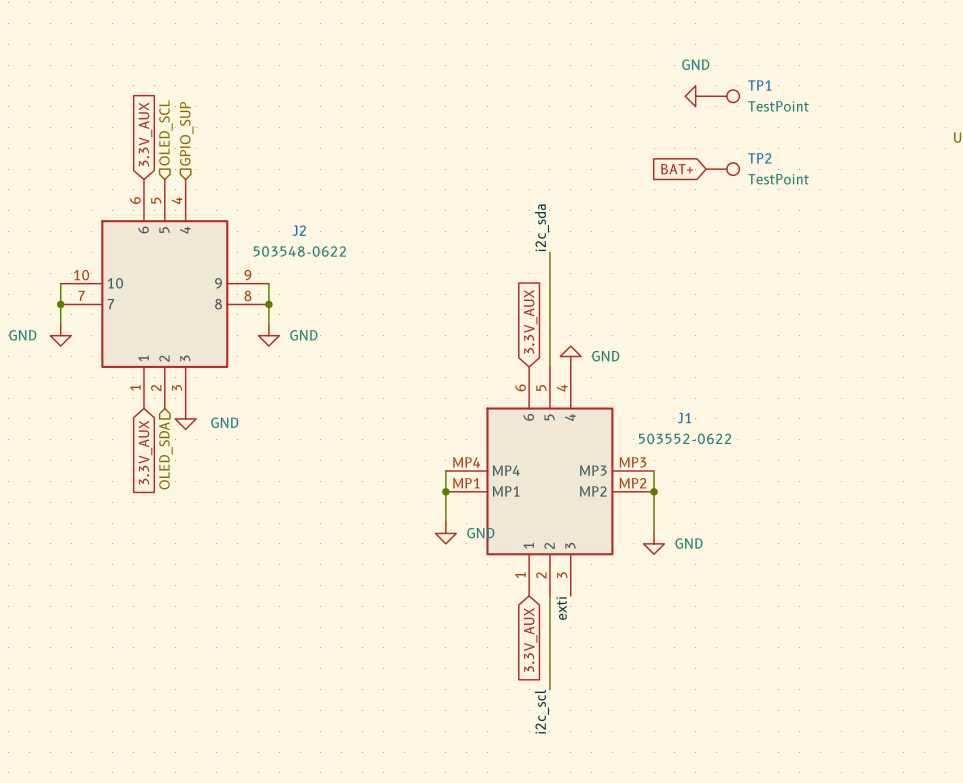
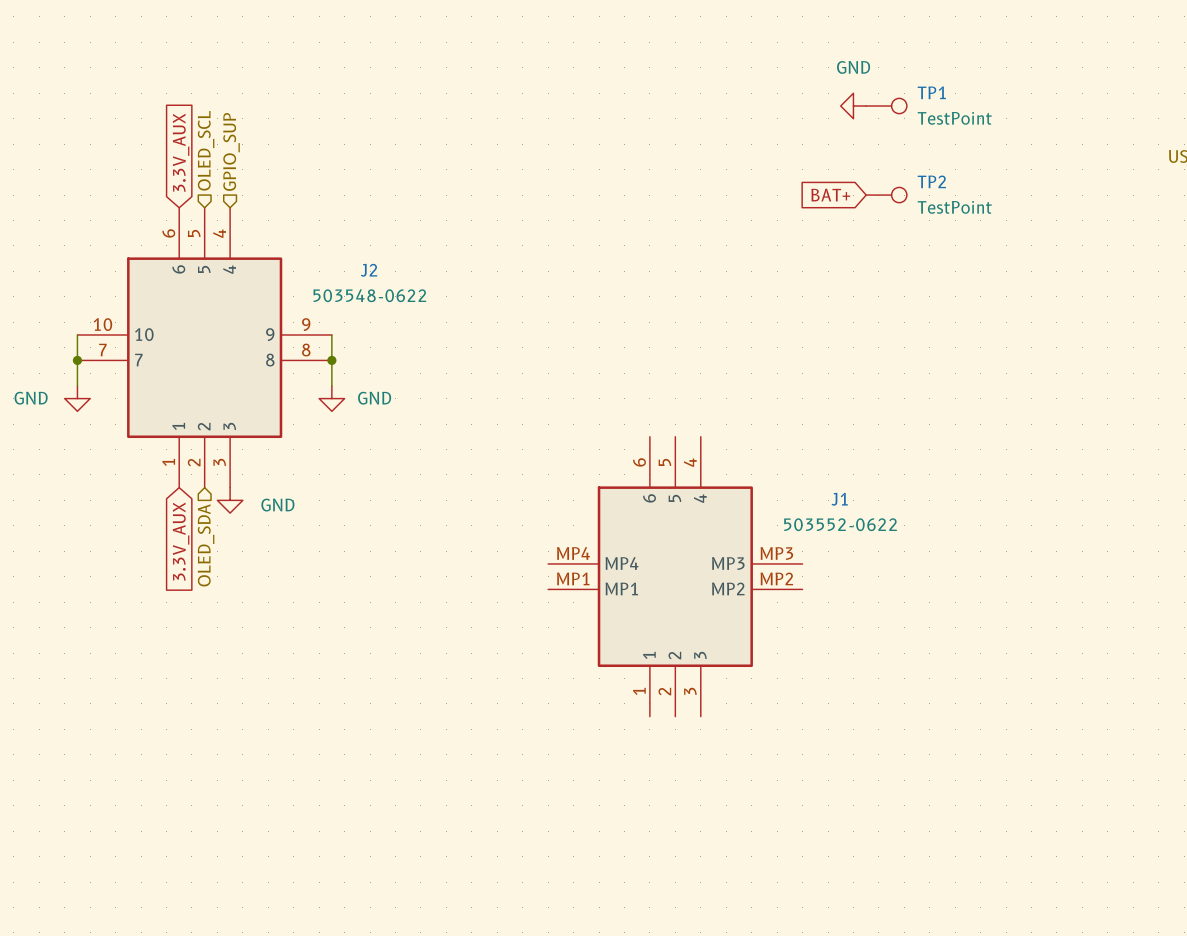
label: i2c_sda (541, 227) -> none
wire: (549, 252) (549, 366) -> none
global label: 3.3V_AUX (530, 321) -> none
power symbol: GND (570, 356) -> none
wire: (445, 471) (445, 523) -> none
wire: (654, 471) (654, 533) -> none
junction: (445, 491) -> none
junction: (654, 491) -> none
power symbol: GND (445, 533) -> none
power symbol: GND (654, 543) -> none
wire: (549, 595) (549, 689) -> none
label: exti (561, 608) -> none
global label: 3.3V_AUX (530, 640) -> none
label: i2c_scl (541, 711) -> none

